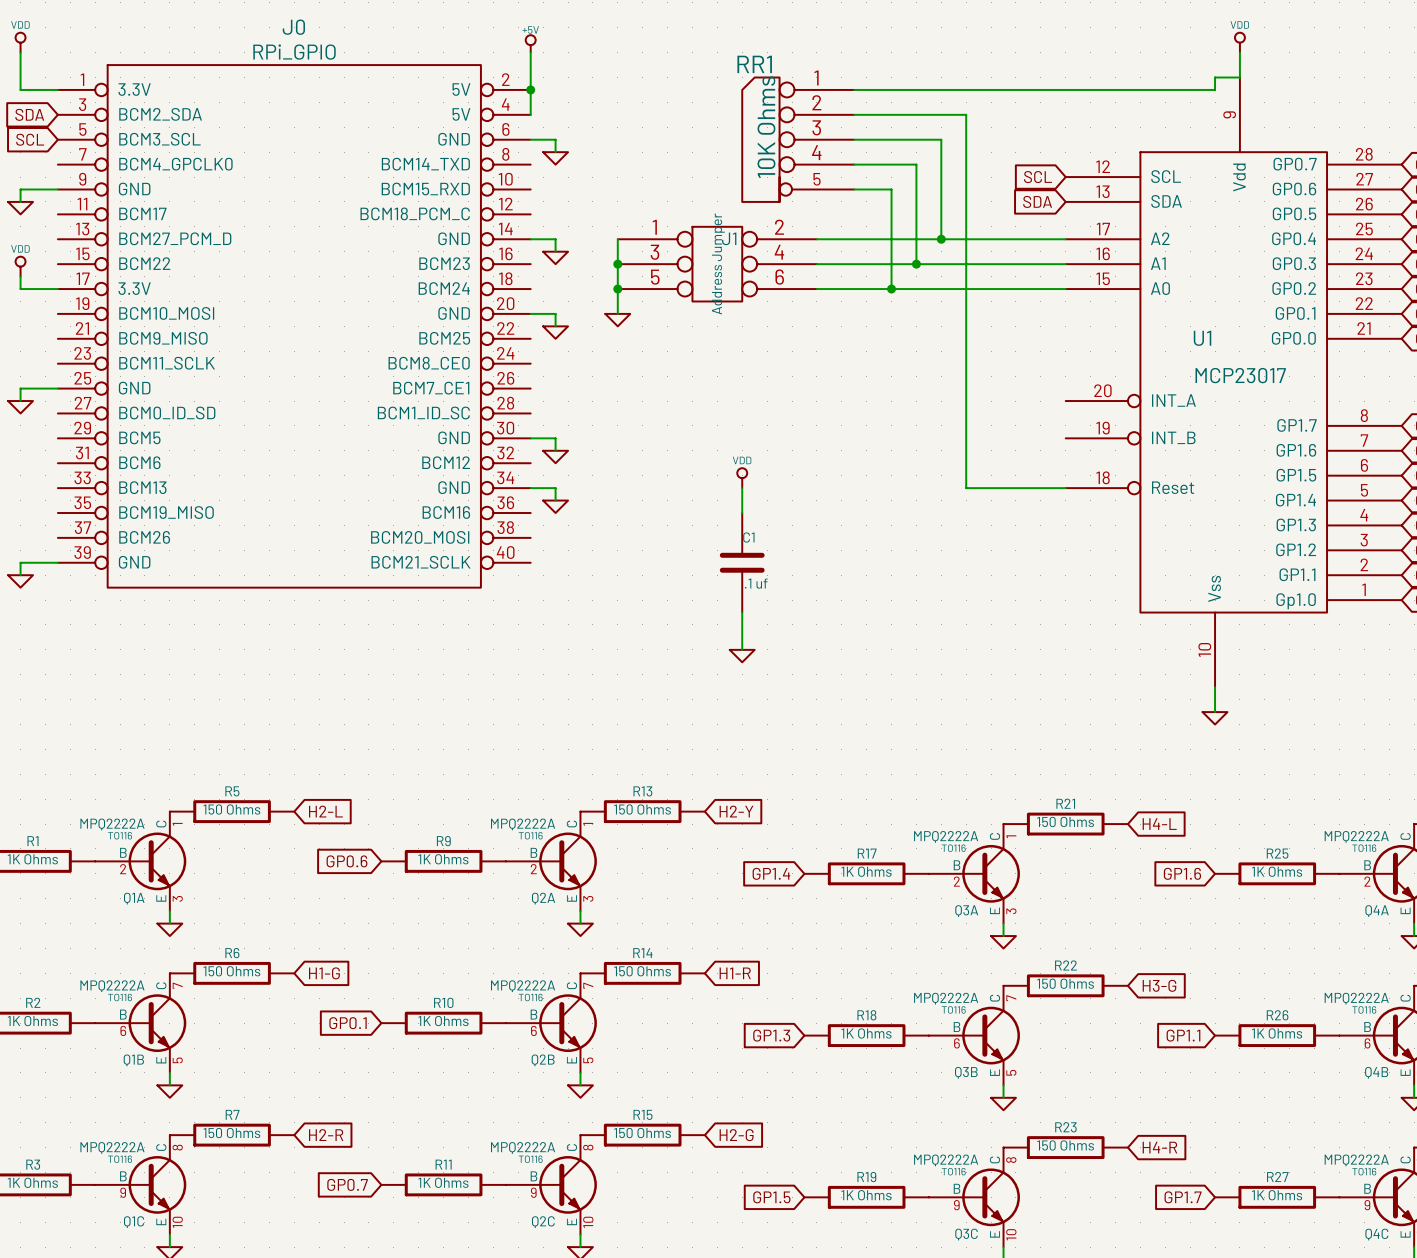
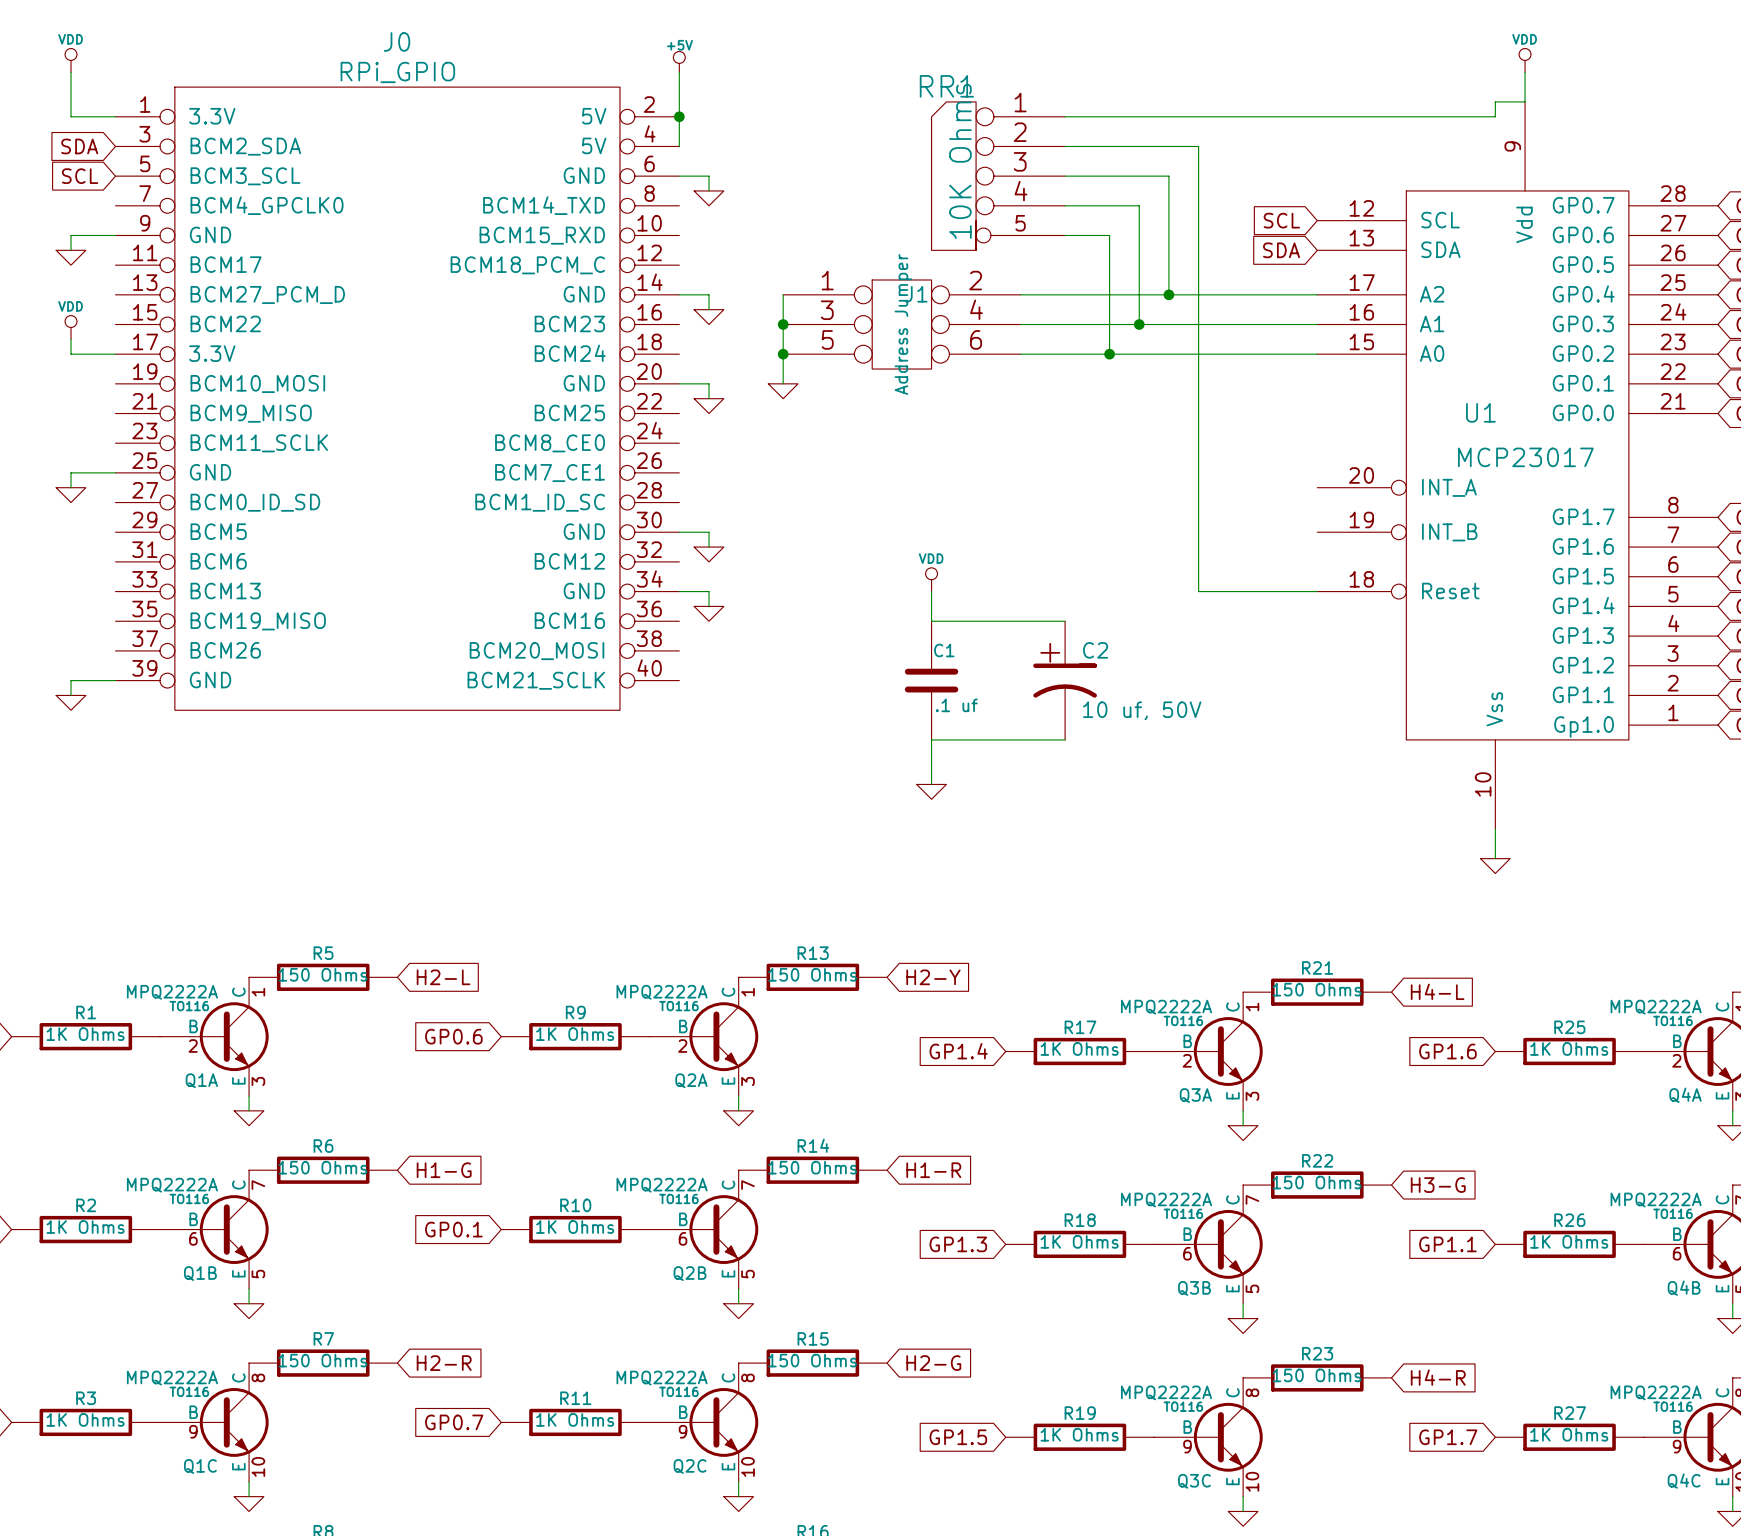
wire: none -> (931, 621) (1065, 621)
C2: none -> 10 uf, 50V (1065, 680)
wire: none -> (931, 739) (1065, 739)

